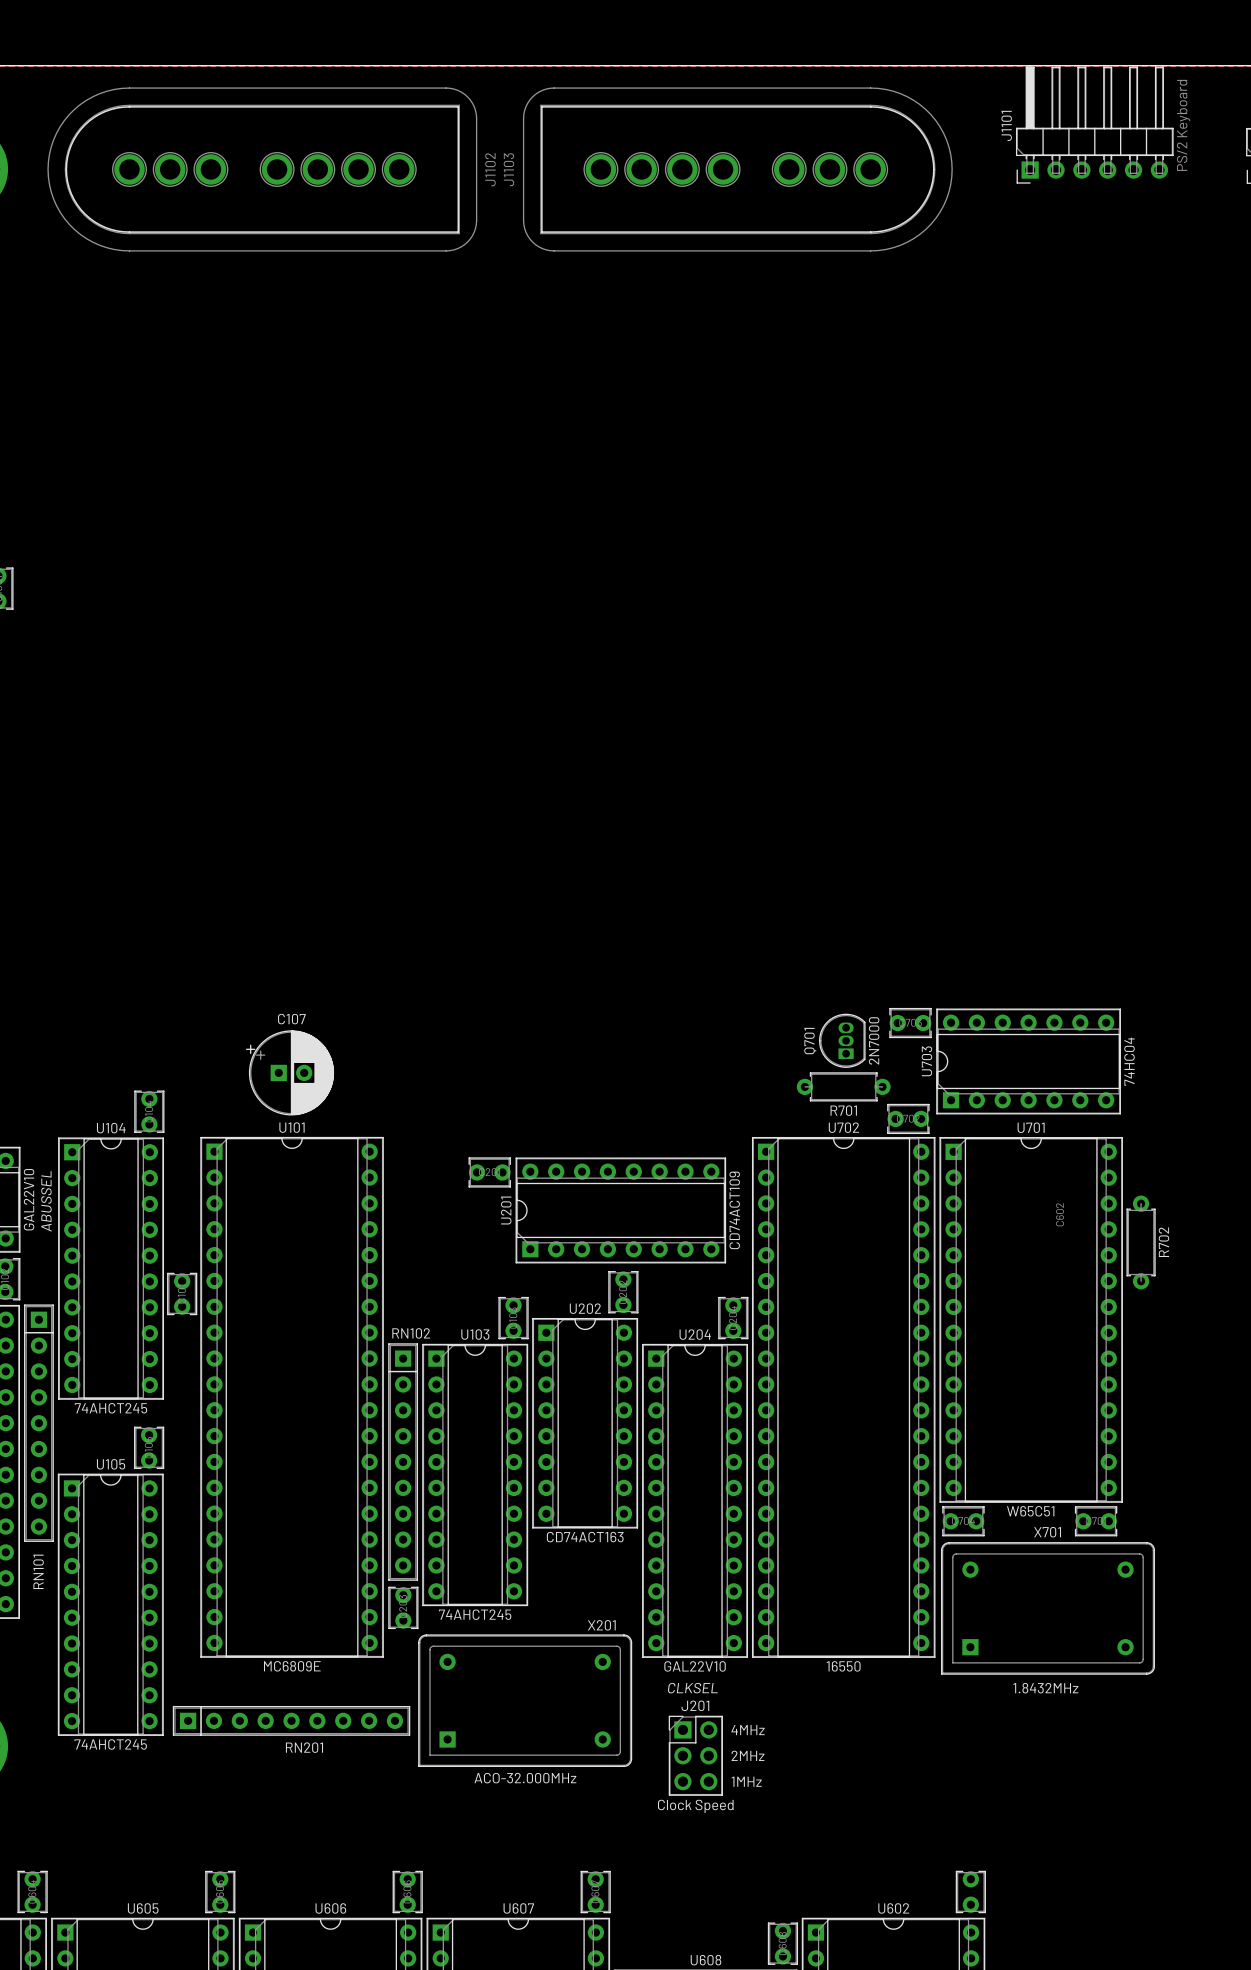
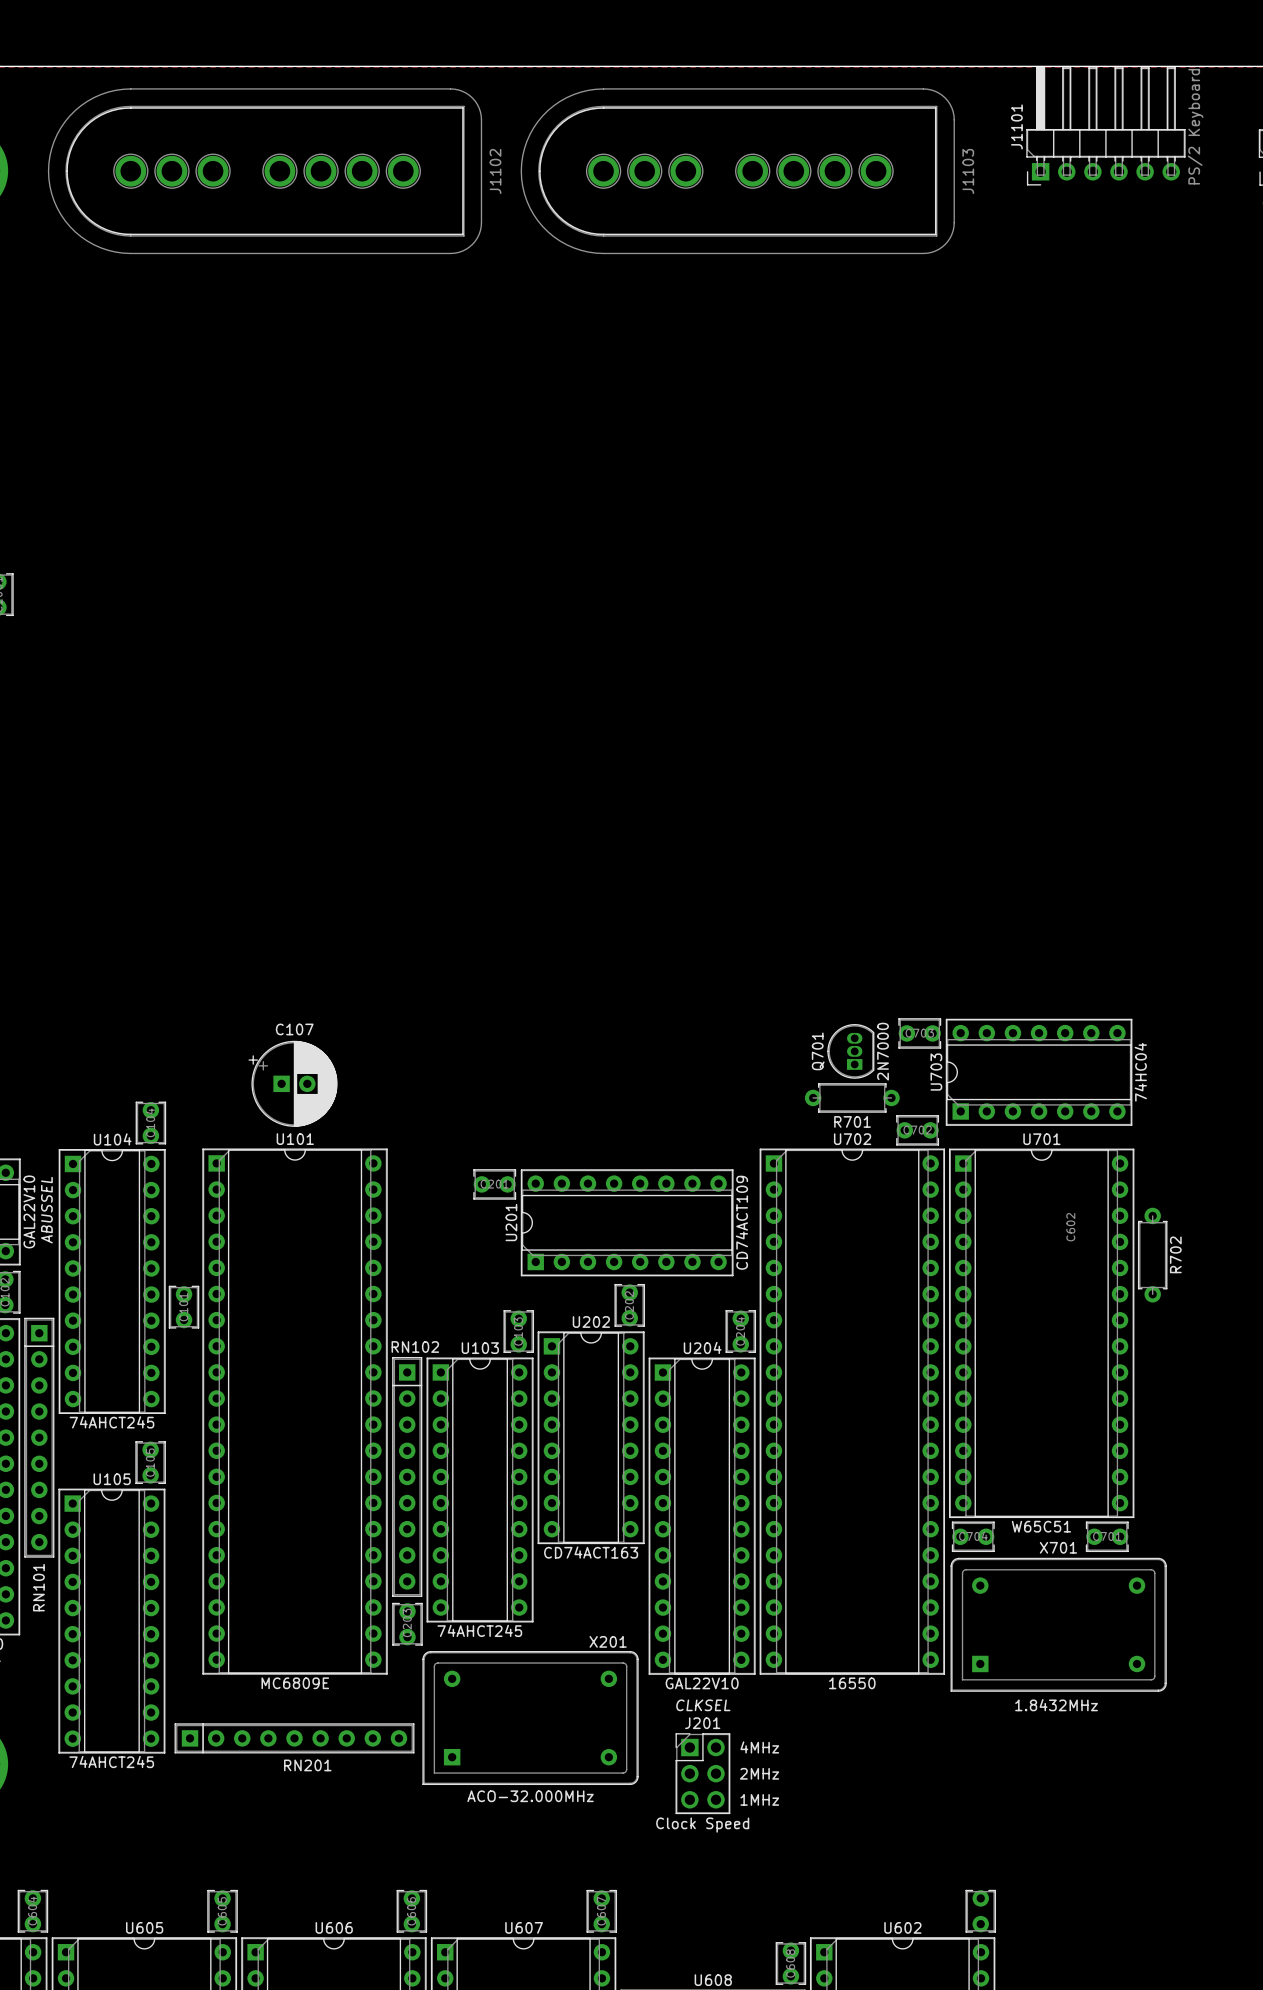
J1103 rotation: 0° (737, 169) -> 180° (737, 171)

